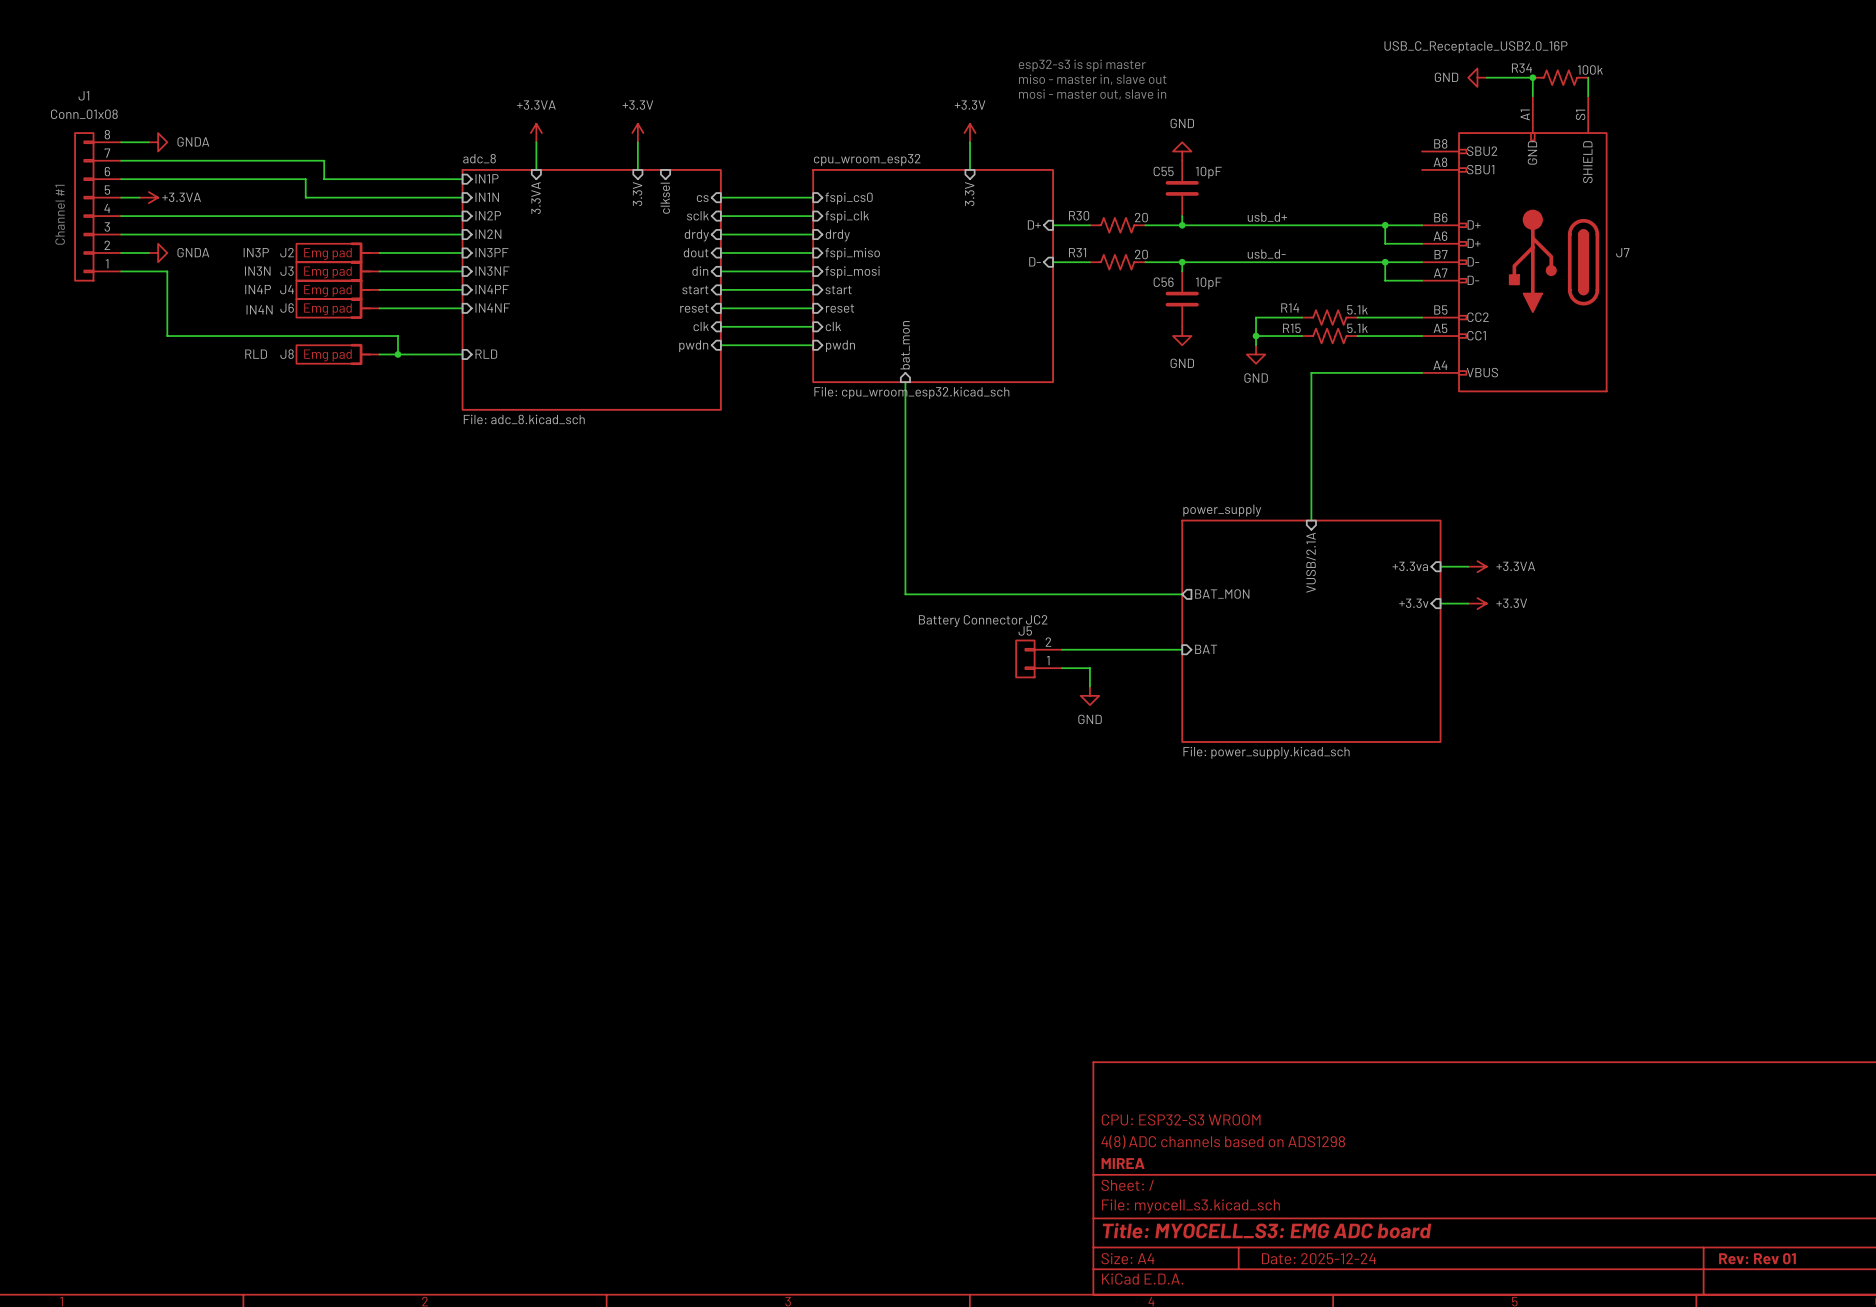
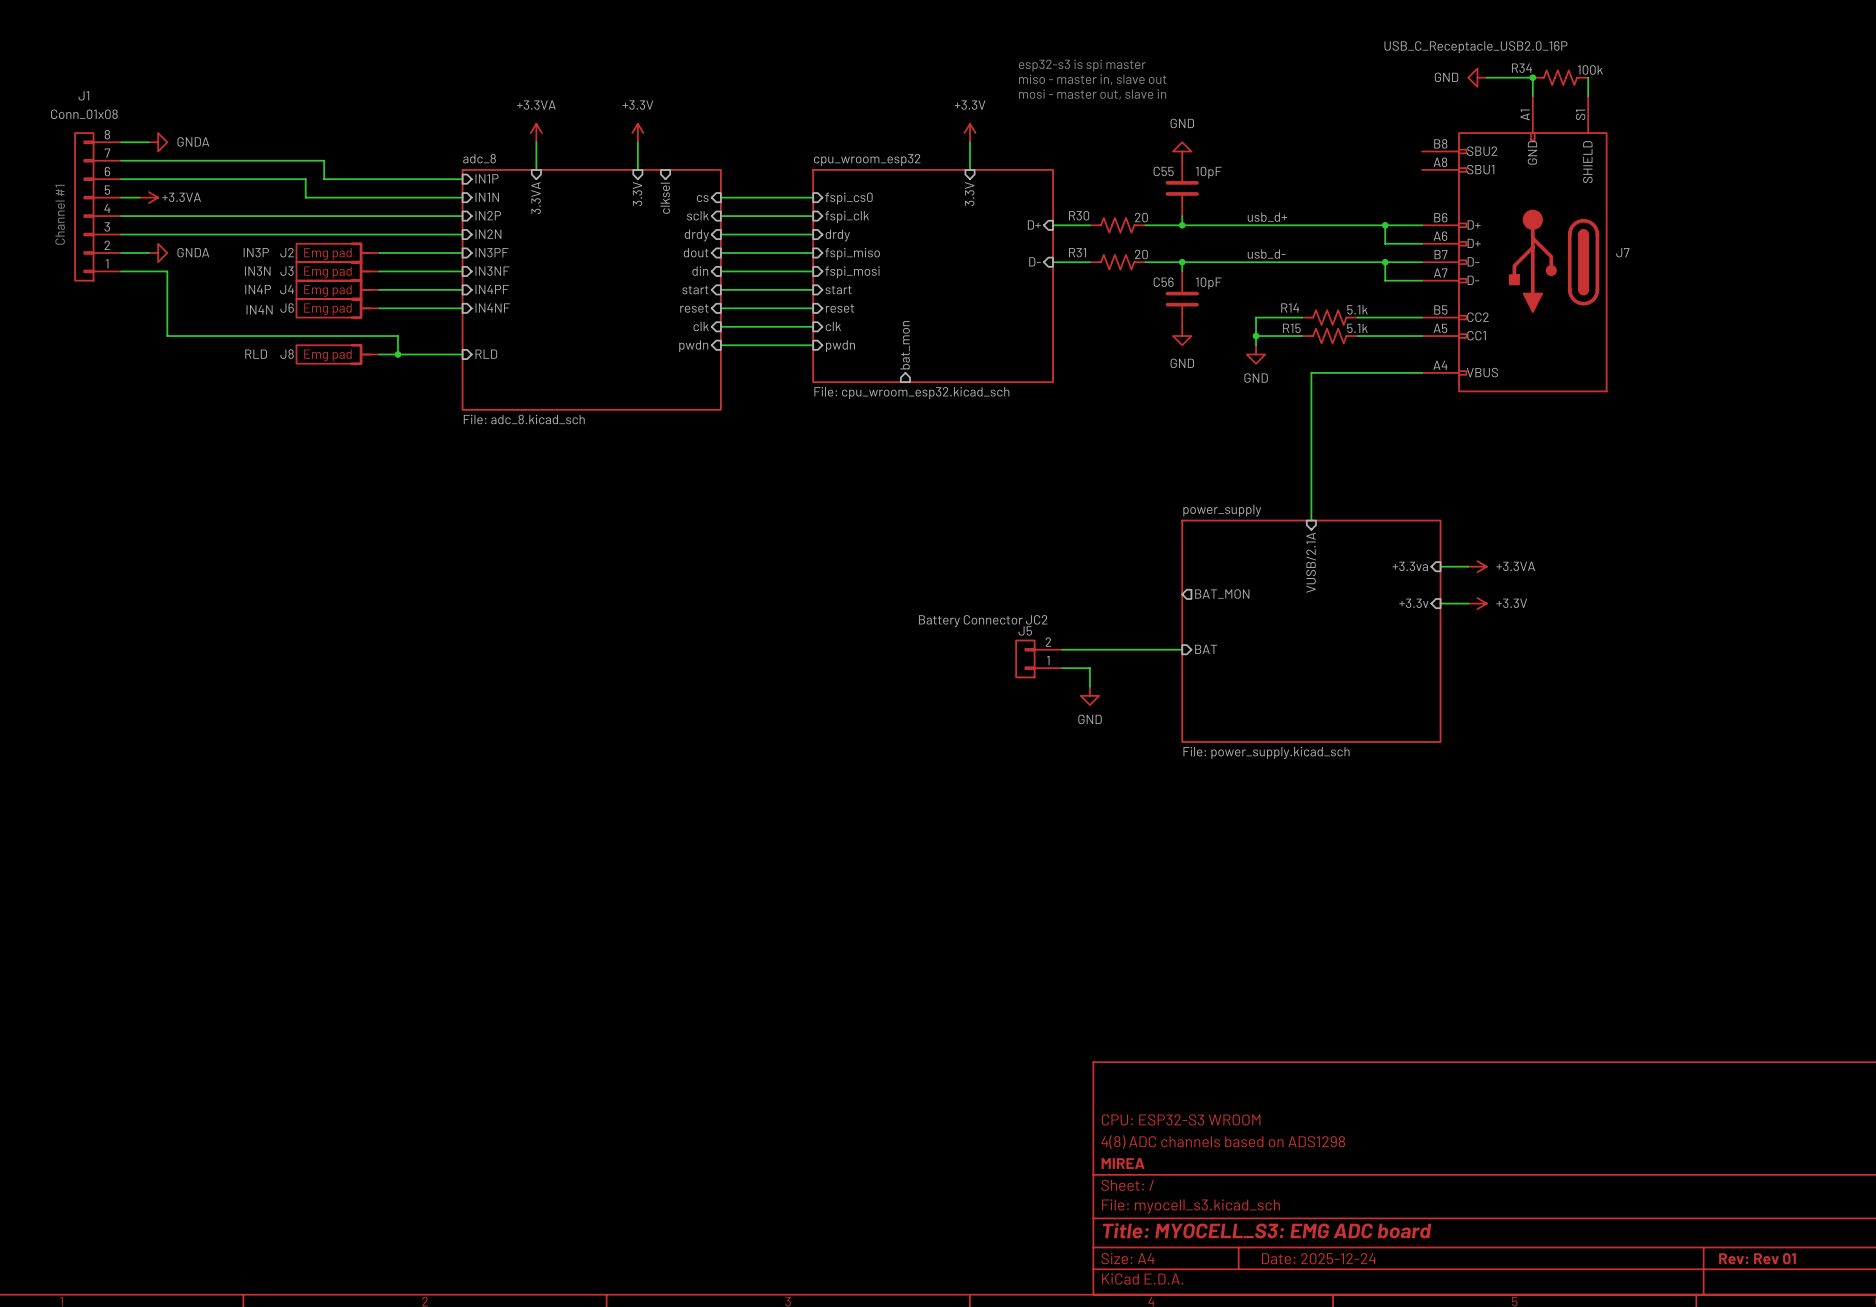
wire: (905, 382) (905, 594) (1182, 594) -> none

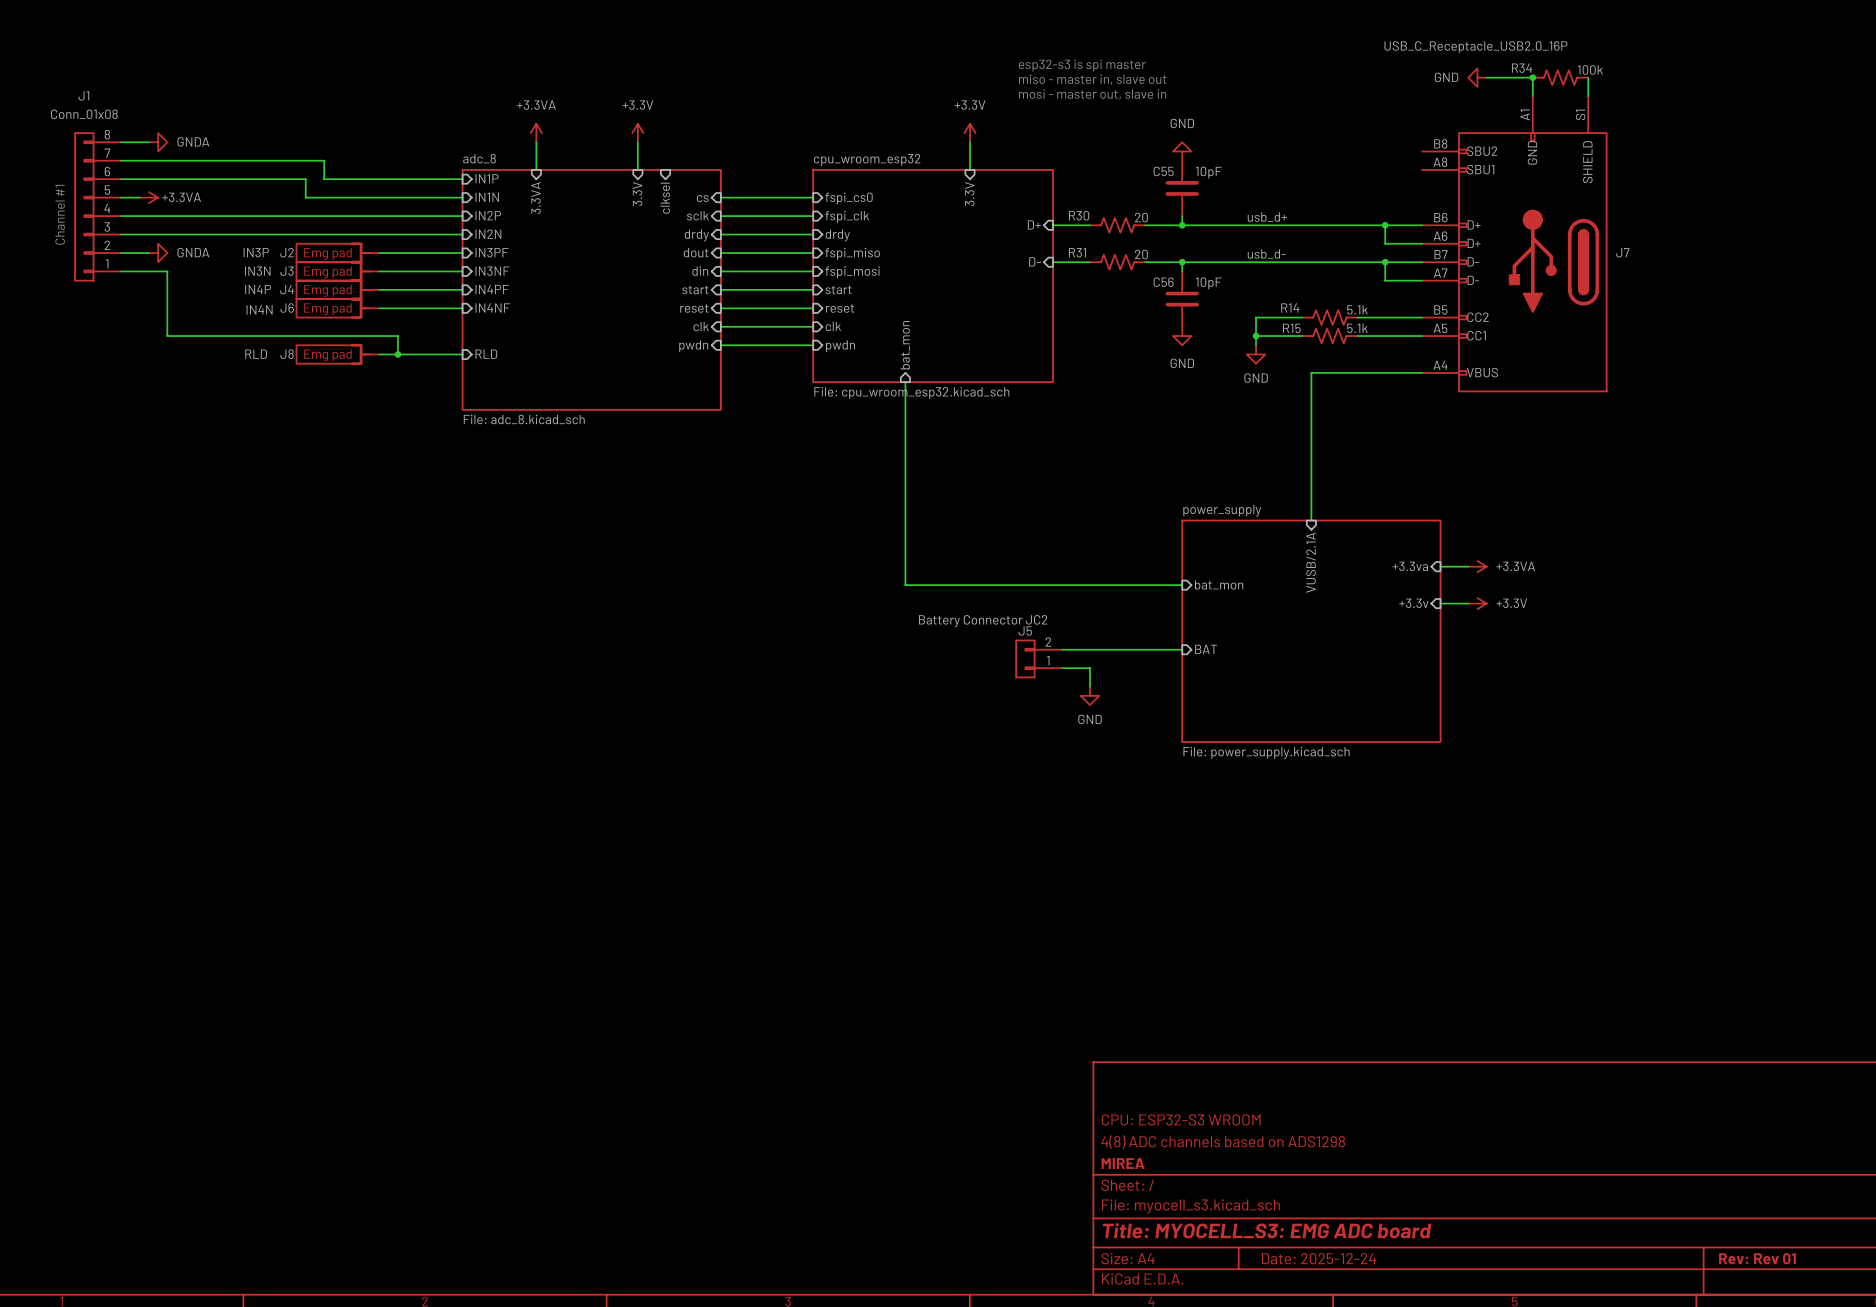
wire: none -> (905, 382) (905, 585) (1182, 585)
sheet pin: none -> bat_mon (1219, 584)
sheet pin: BAT_MON (1222, 594) -> none

